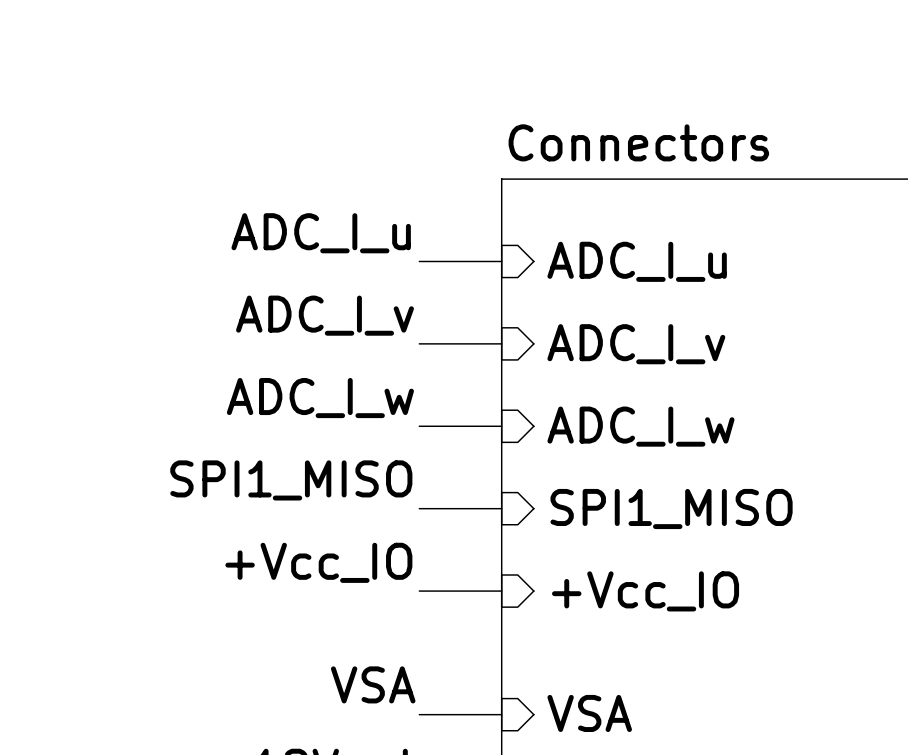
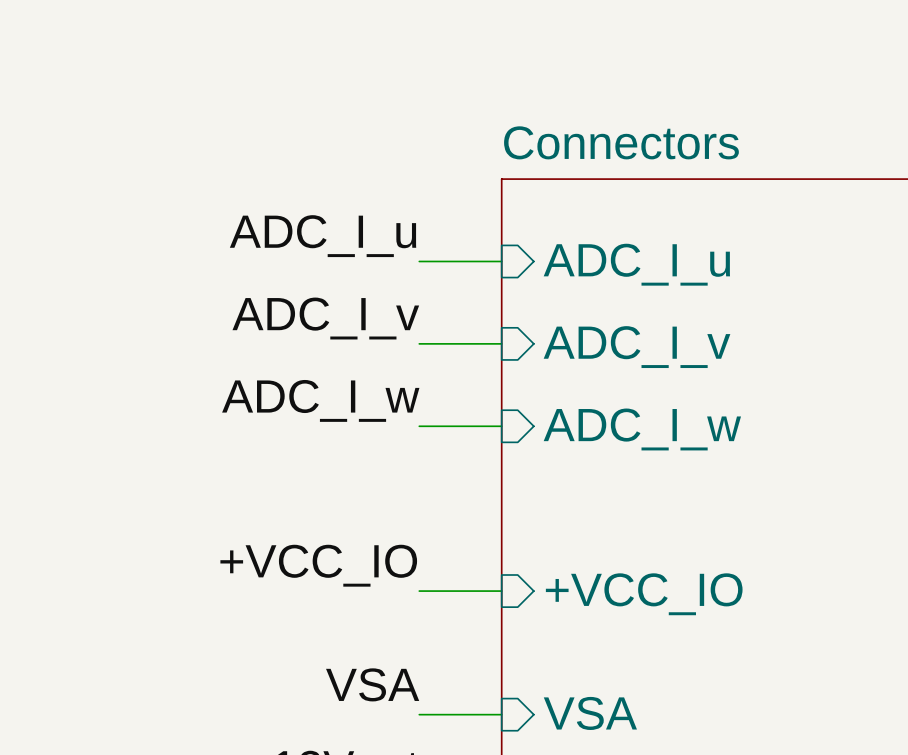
label: SPI1_MISO (291, 480) -> none
wire: (419, 508) (501, 508) -> none
sheet pin: SPI1_MISO (671, 509) -> none
label: +Vcc_IO (318, 562) -> +VCC_IO (318, 565)
sheet pin: +Vcc_IO (645, 591) -> +VCC_IO (644, 594)

